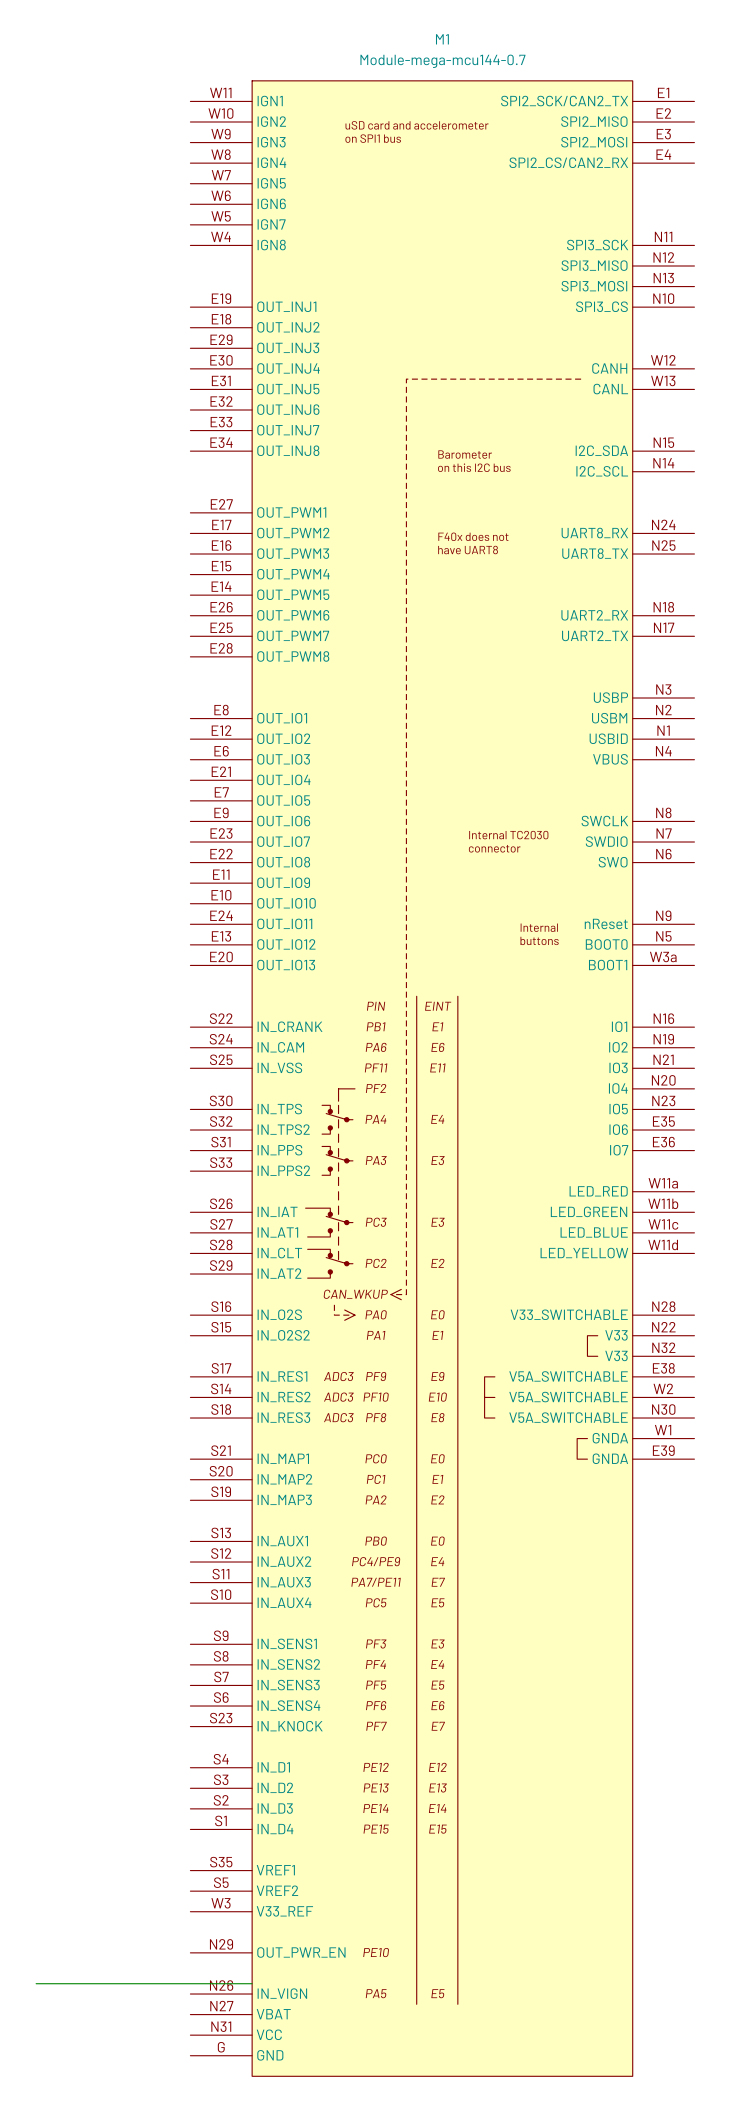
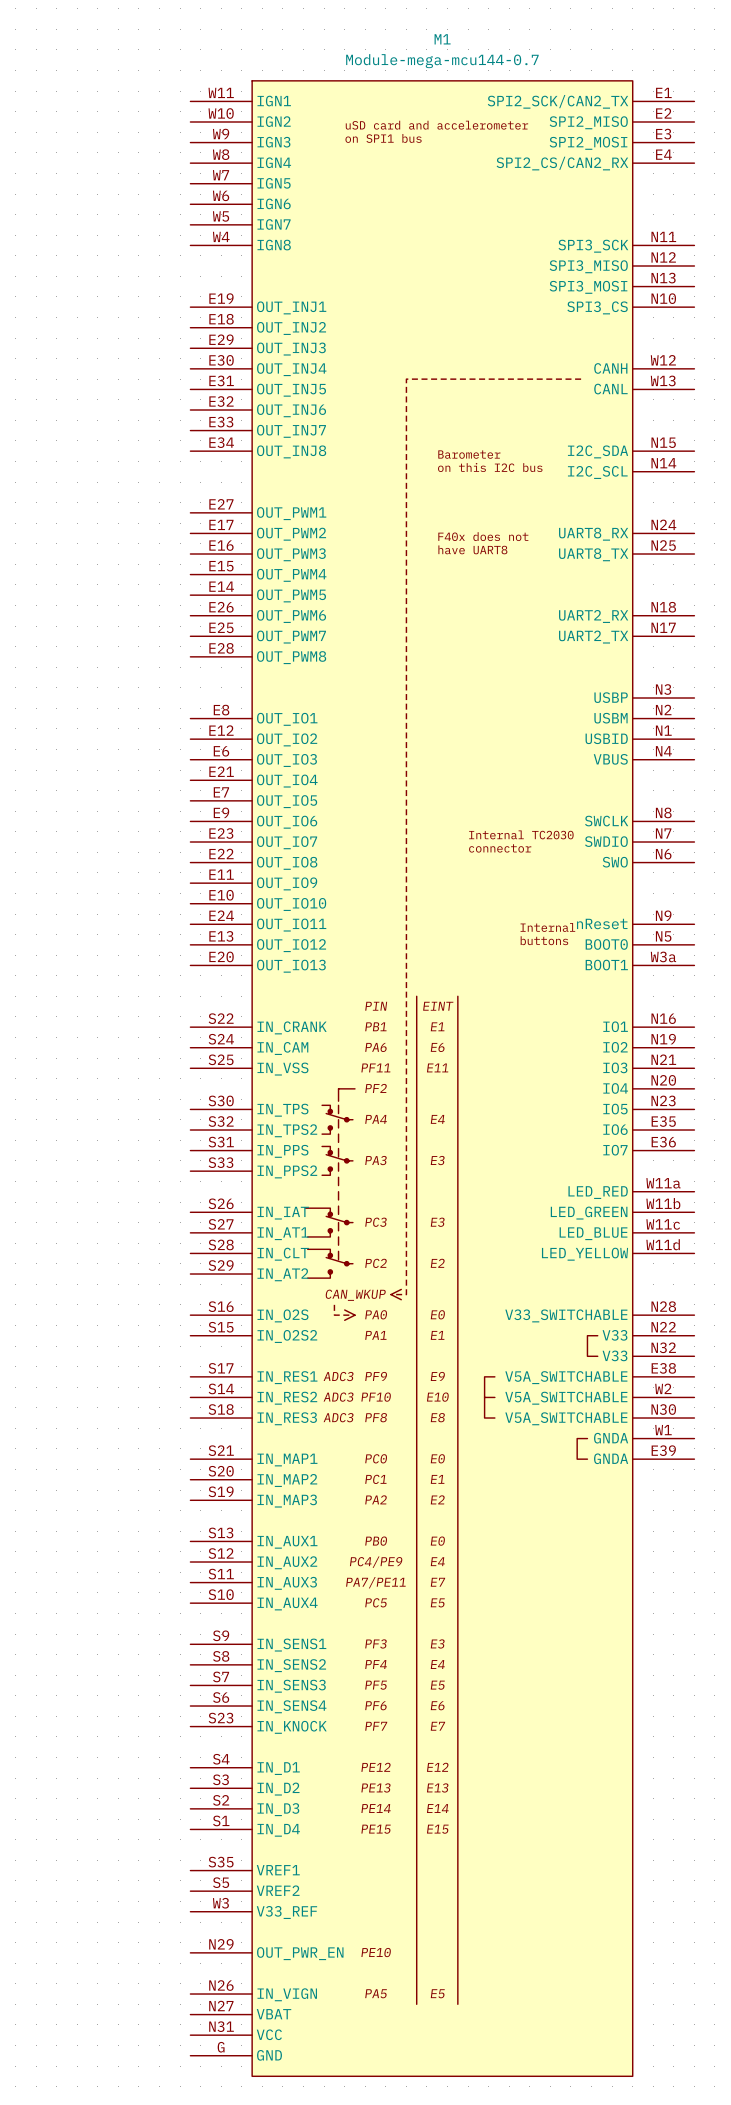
wire: (36, 1983) (252, 1983) -> none

